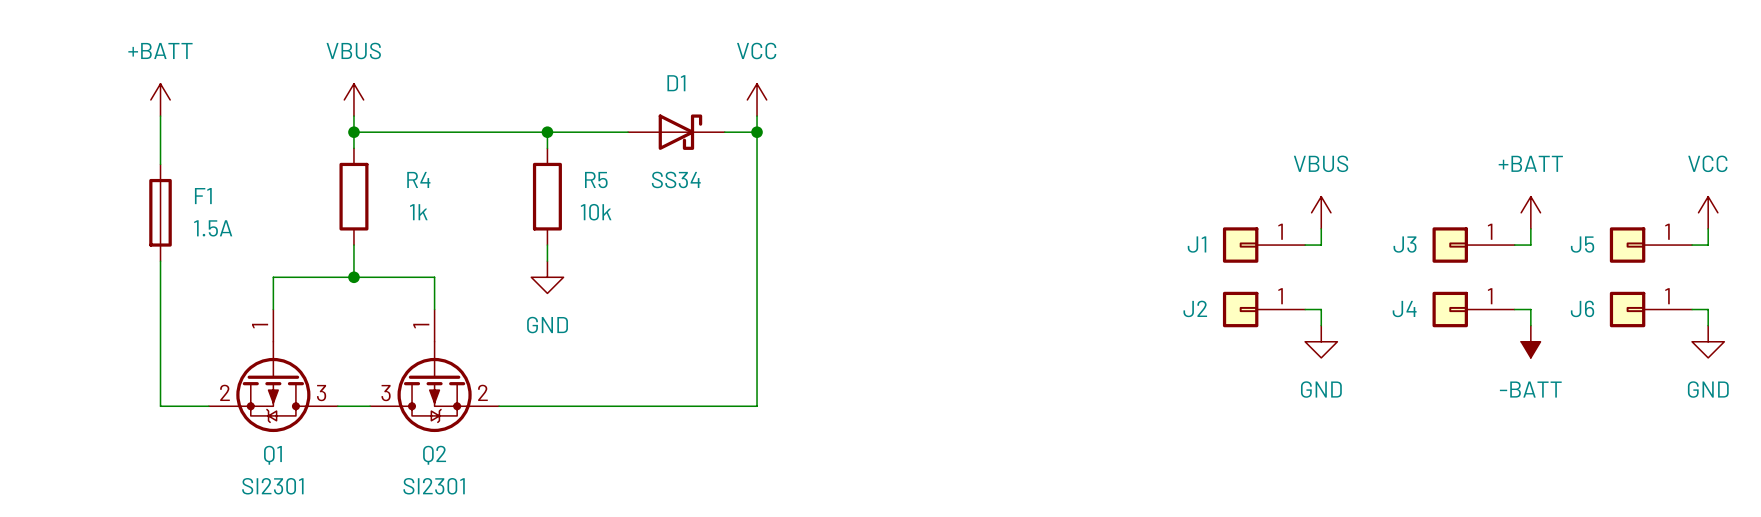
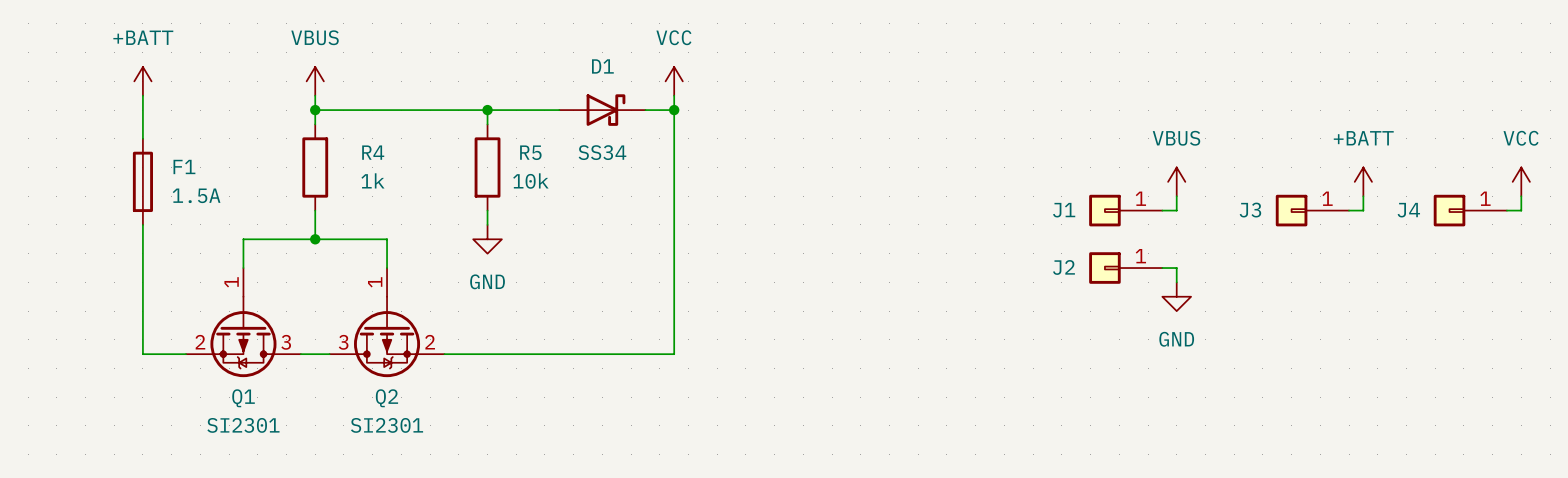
J5 name: J5 (1582, 244) -> J4 (1408, 210)
J4: (1473, 309) -> none
wire: (1514, 309) (1530, 309) (1530, 325) -> none
J6: (1650, 309) -> none
wire: (1692, 309) (1708, 309) (1708, 325) -> none
power symbol: -BATT (1530, 341) -> none
power symbol: GND (1708, 341) -> none

